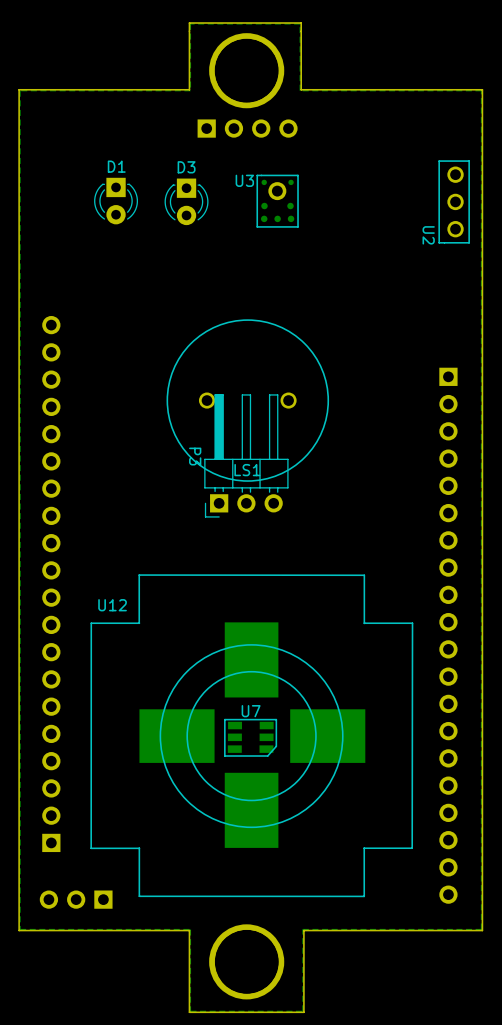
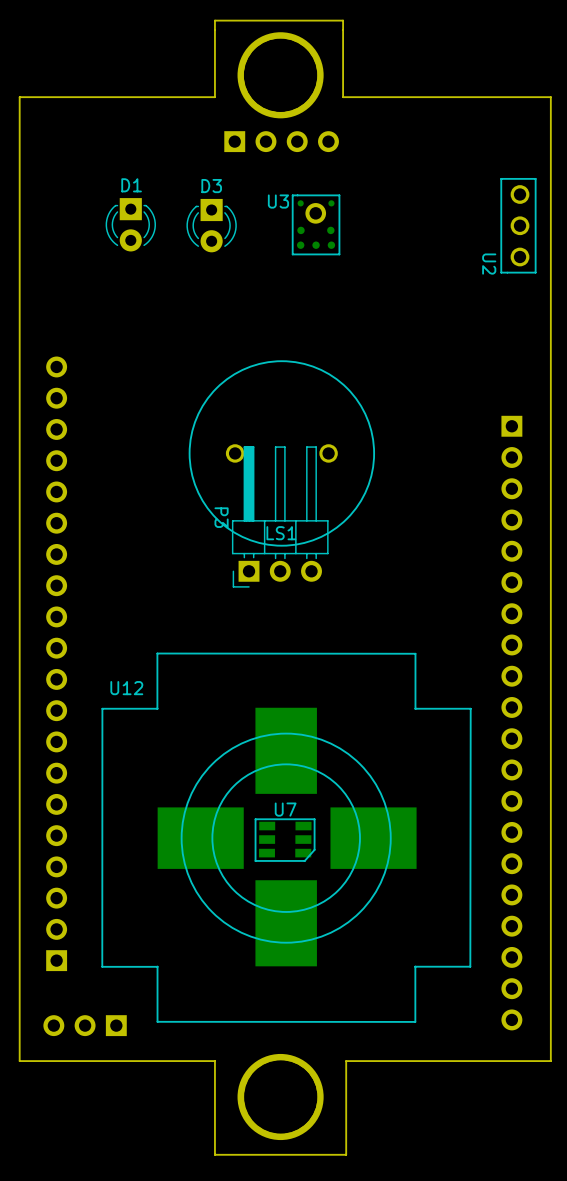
zone outline: (300, 23) (300, 90) (481, 90) (481, 929) (302, 929) (302, 1011) (190, 1011) (190, 929) (20, 929) (20, 90) (190, 90) (190, 23) (300, 23) -> none

